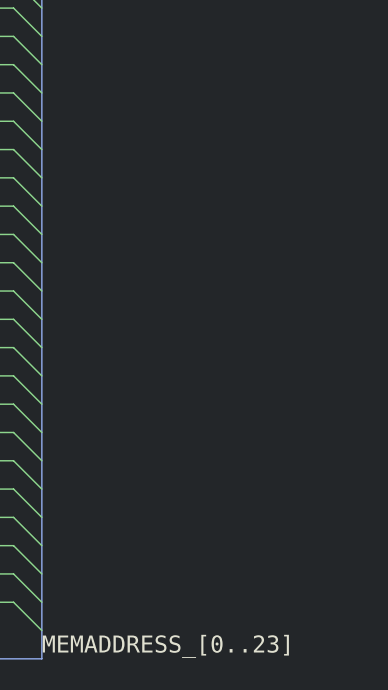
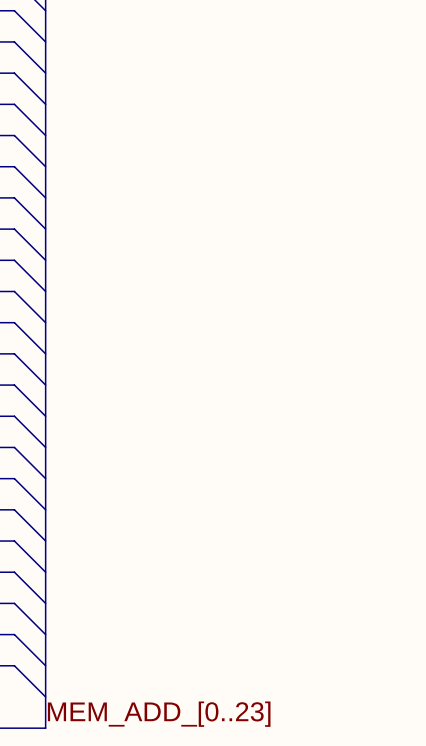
label: MEMADDRESS_[0..23] (165, 646) -> MEM_ADD_[0..23] (159, 714)

